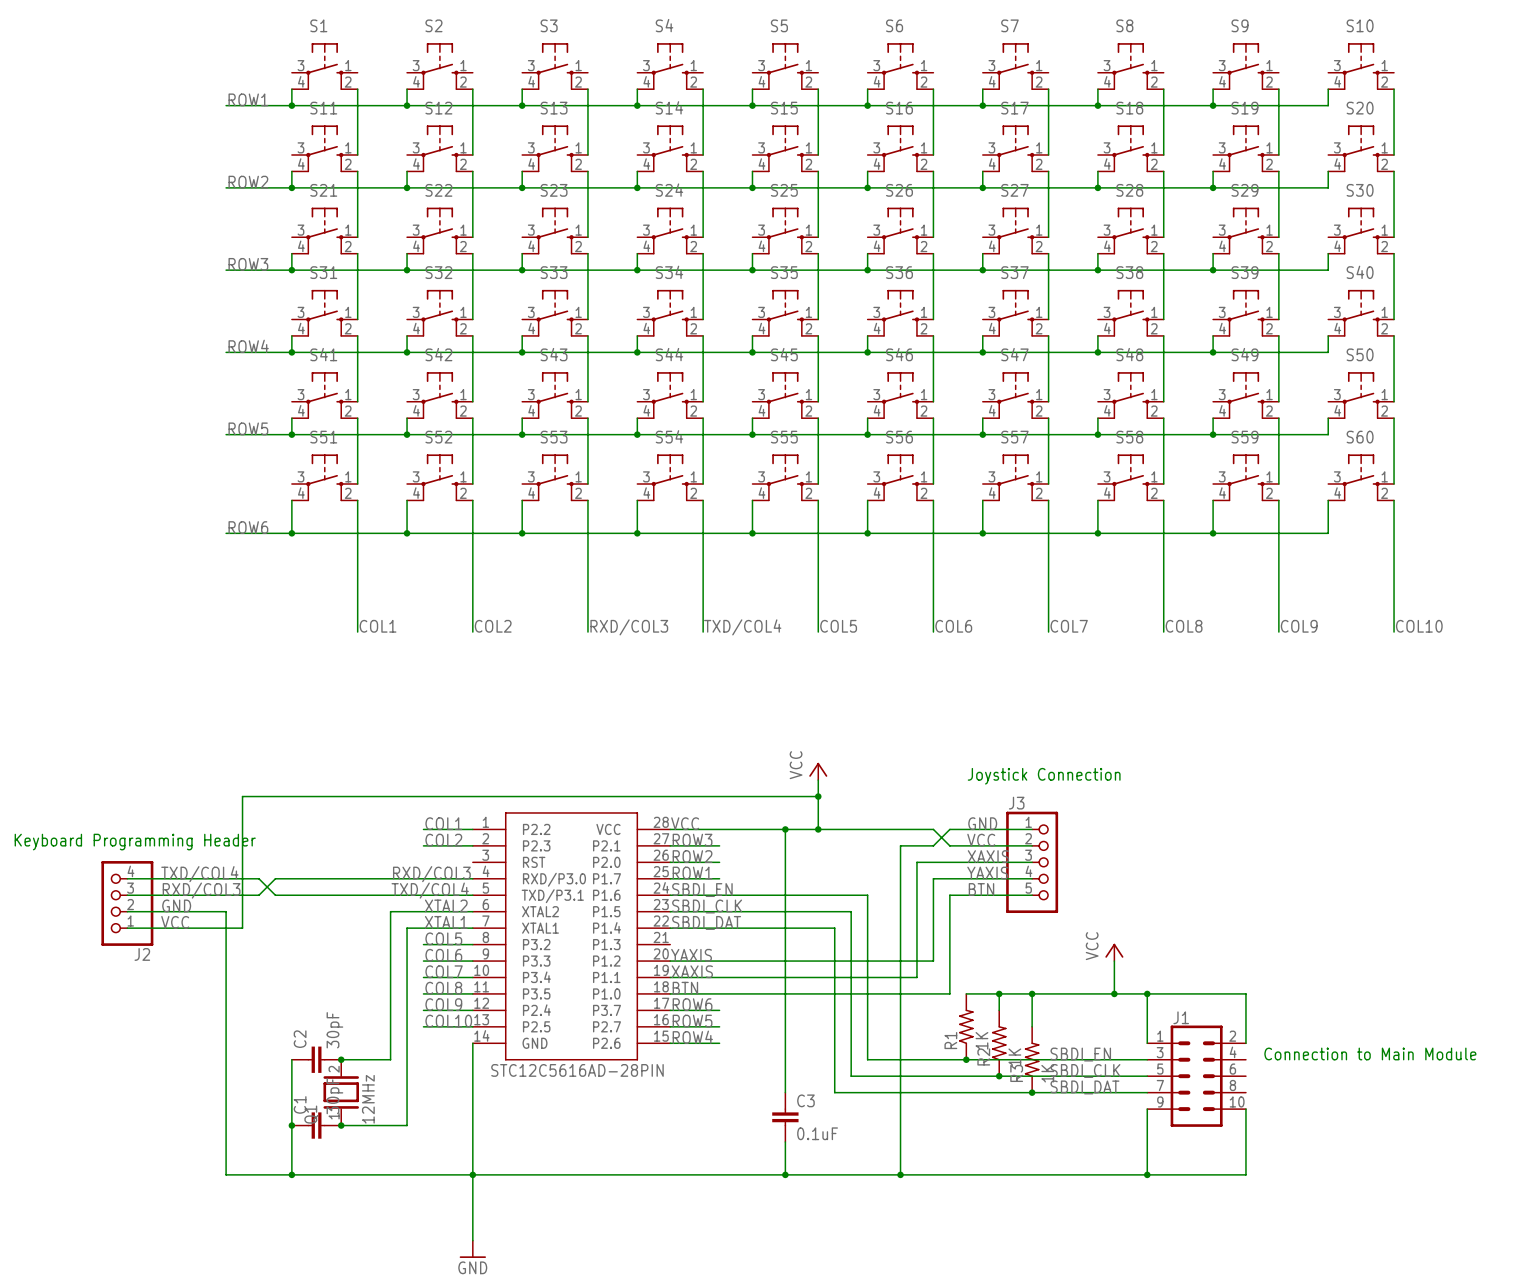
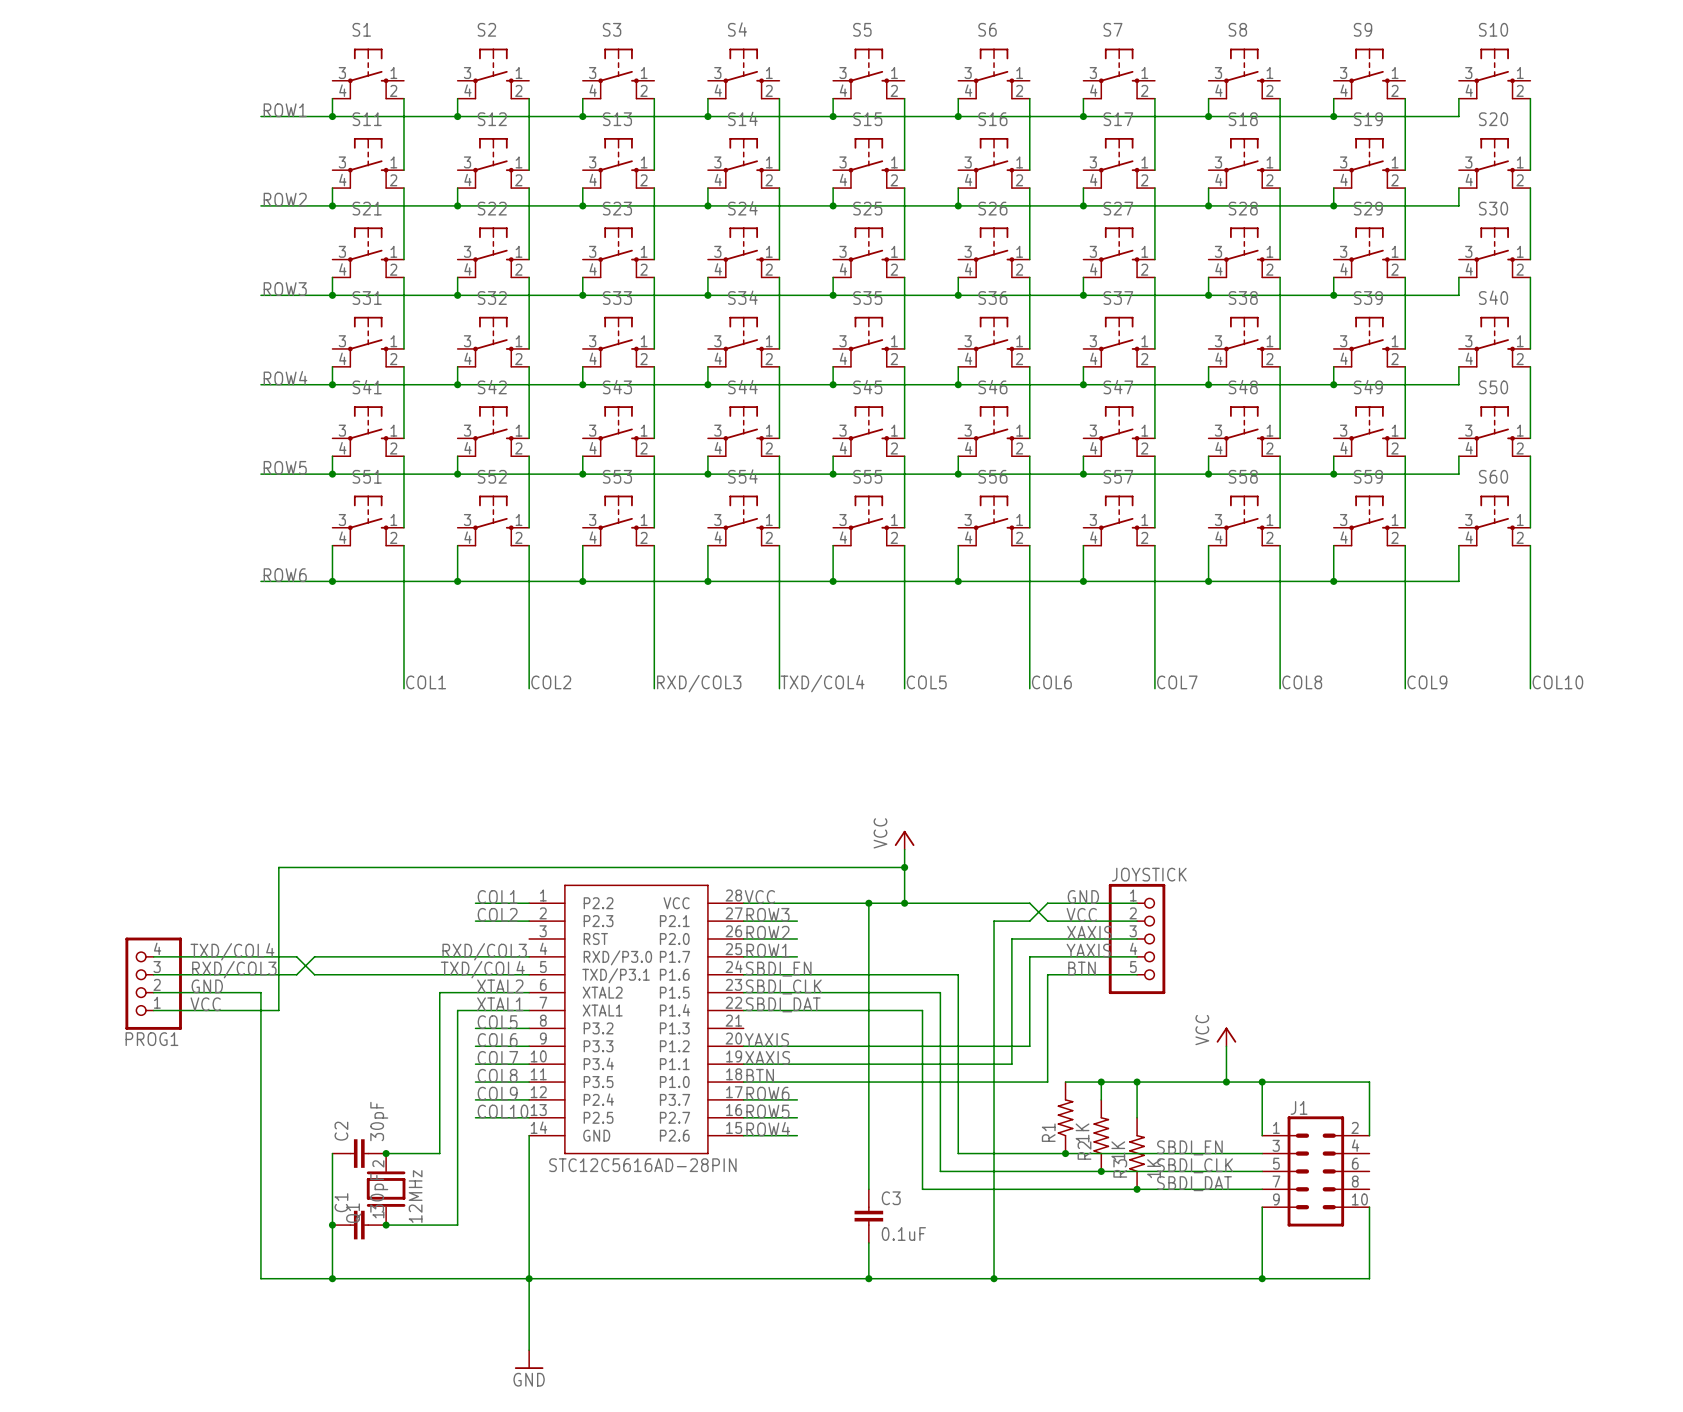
text: Joystick Connection (1044, 776) -> none
J3 name: J3 (1016, 803) -> JOYSTICK (1149, 874)
text: Keyboard Programming Header (135, 842) -> none
J2 name: J2 (142, 954) -> PROG1 (151, 1039)
text: Connection to Main Module (1370, 1053) -> none

